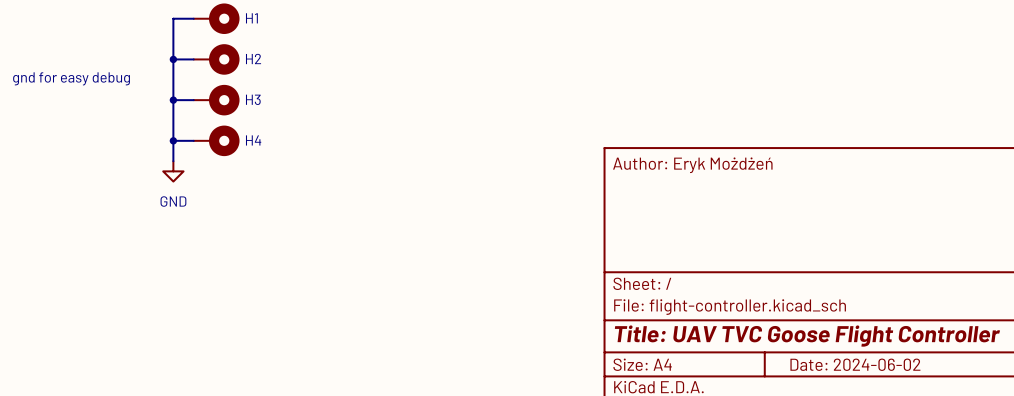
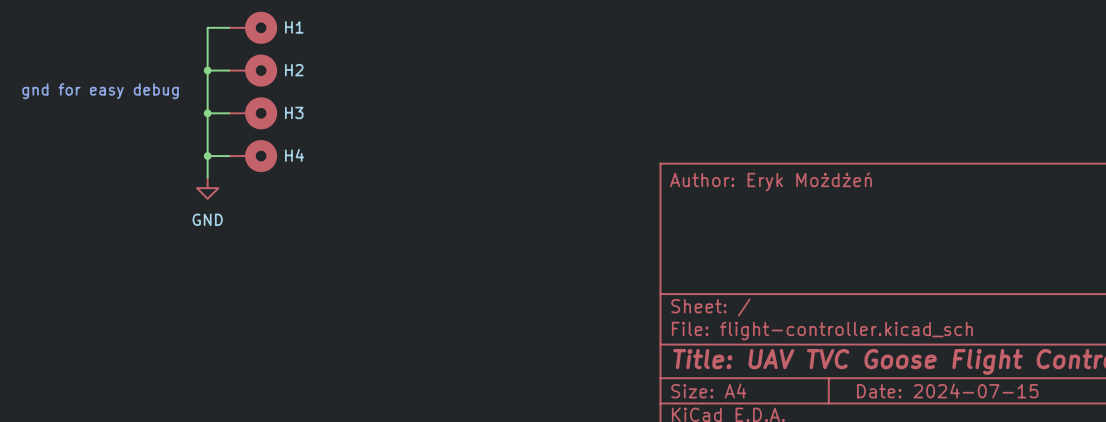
title block: Date: 2024-06-02 (855, 364) -> Date: 2024-07-15 (947, 390)

